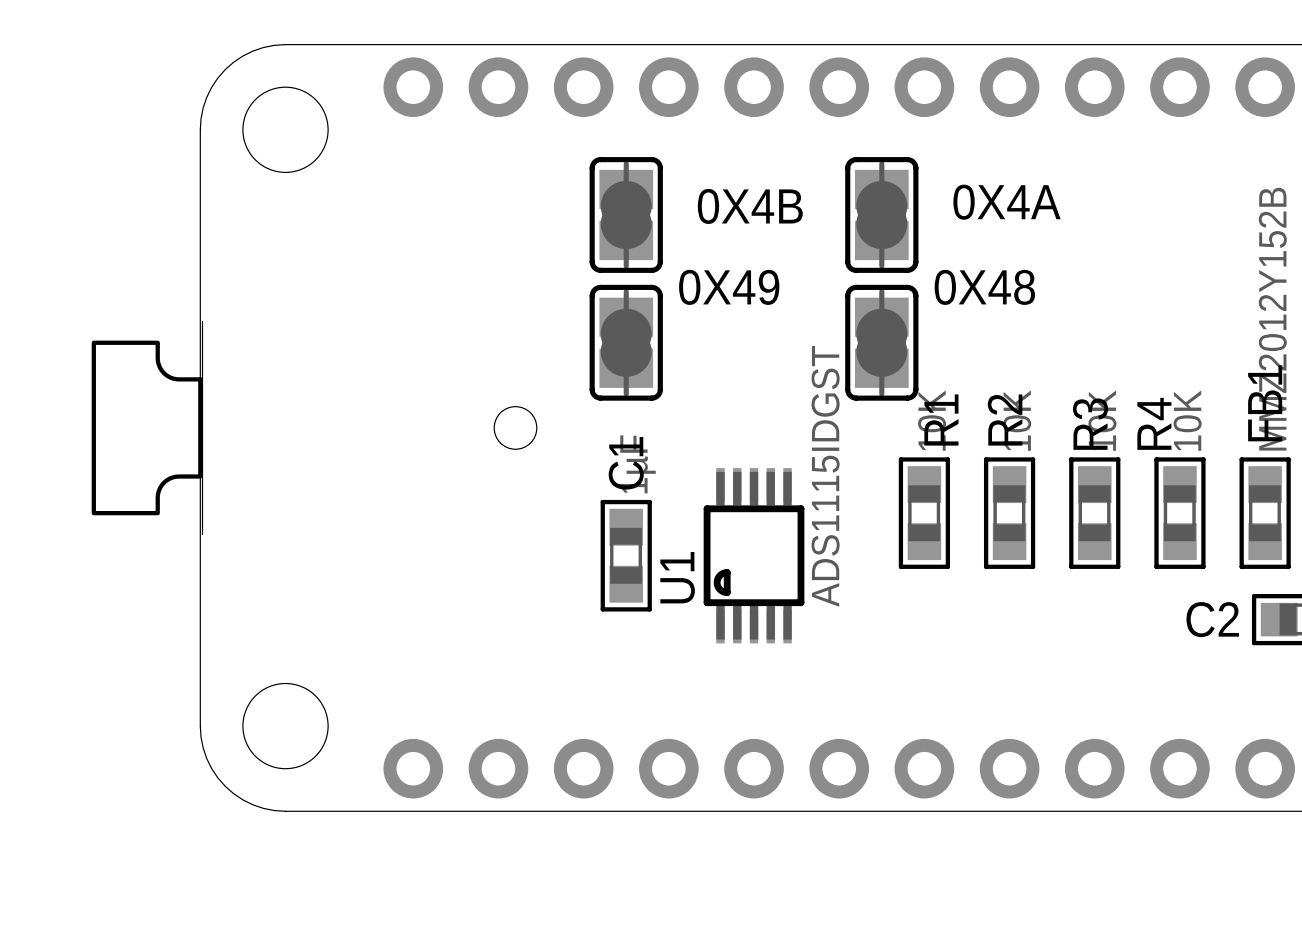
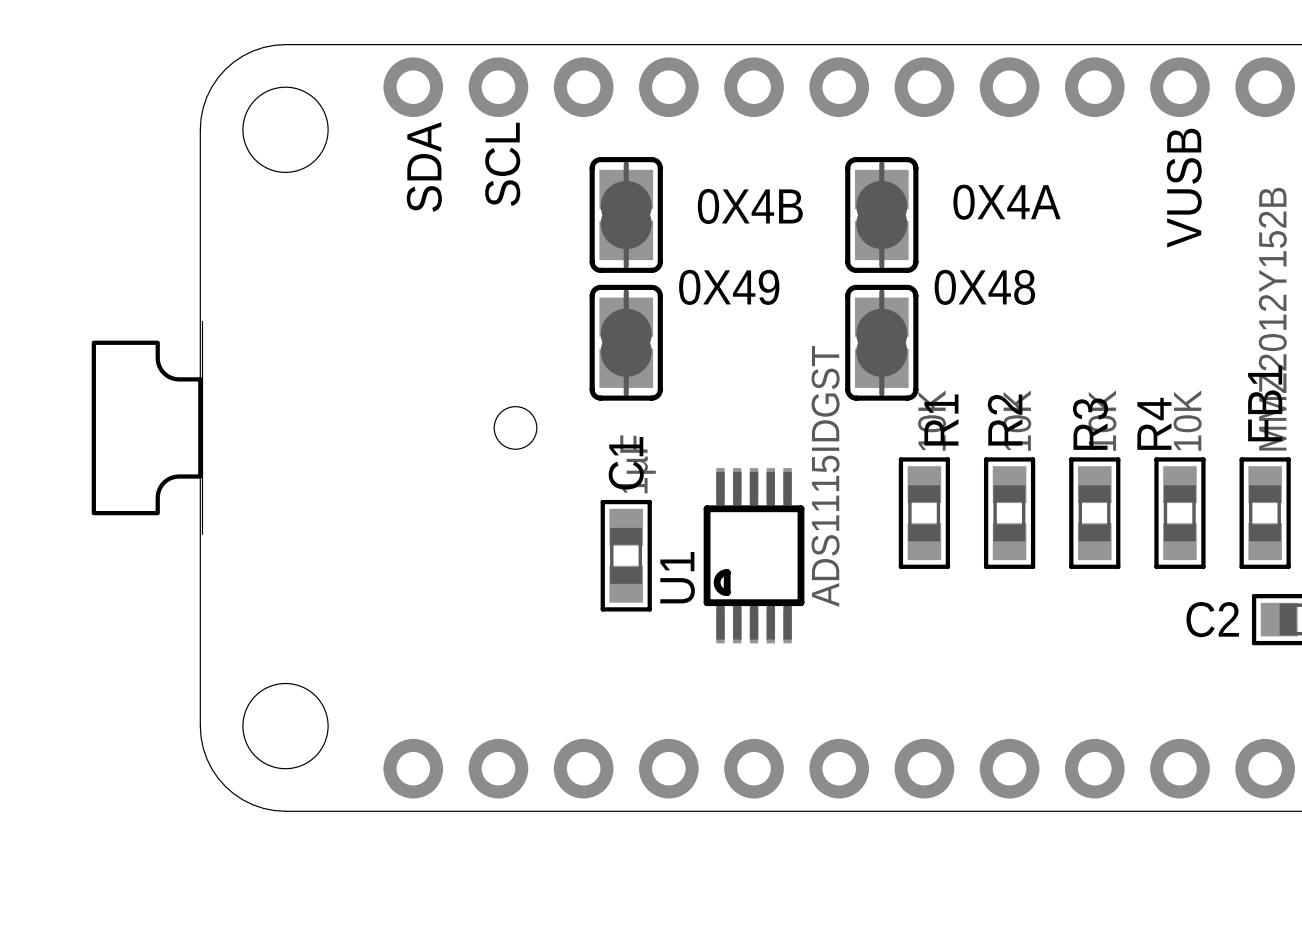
text: none -> SCL (502, 164)
text: none -> SDA (424, 166)
text: none -> VUSB (1184, 188)

